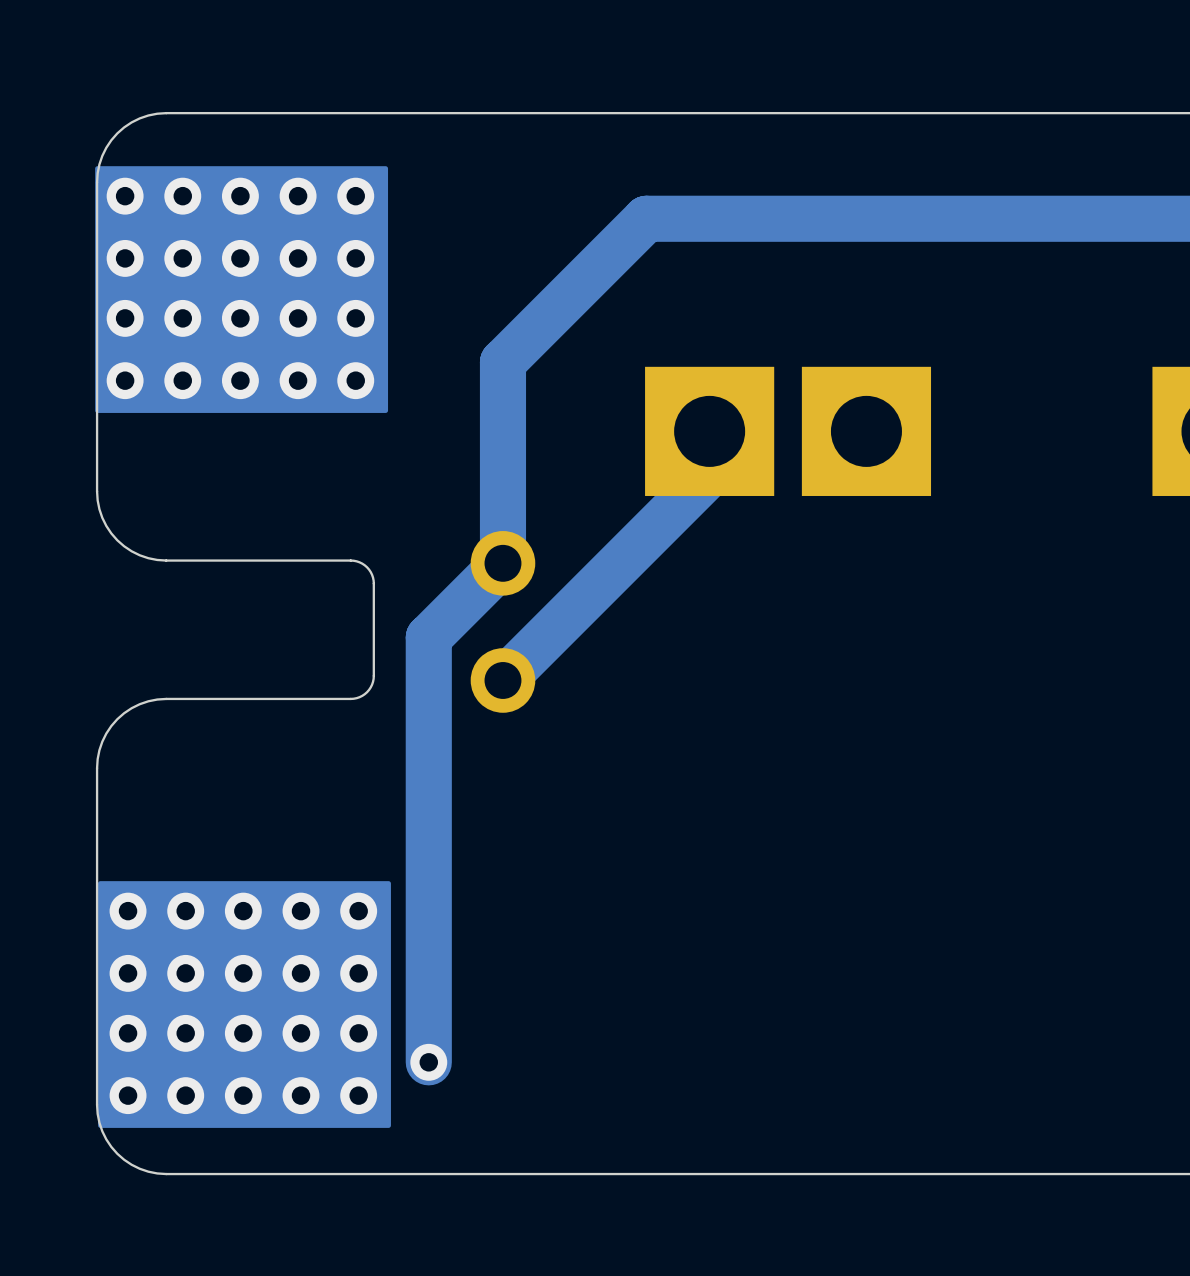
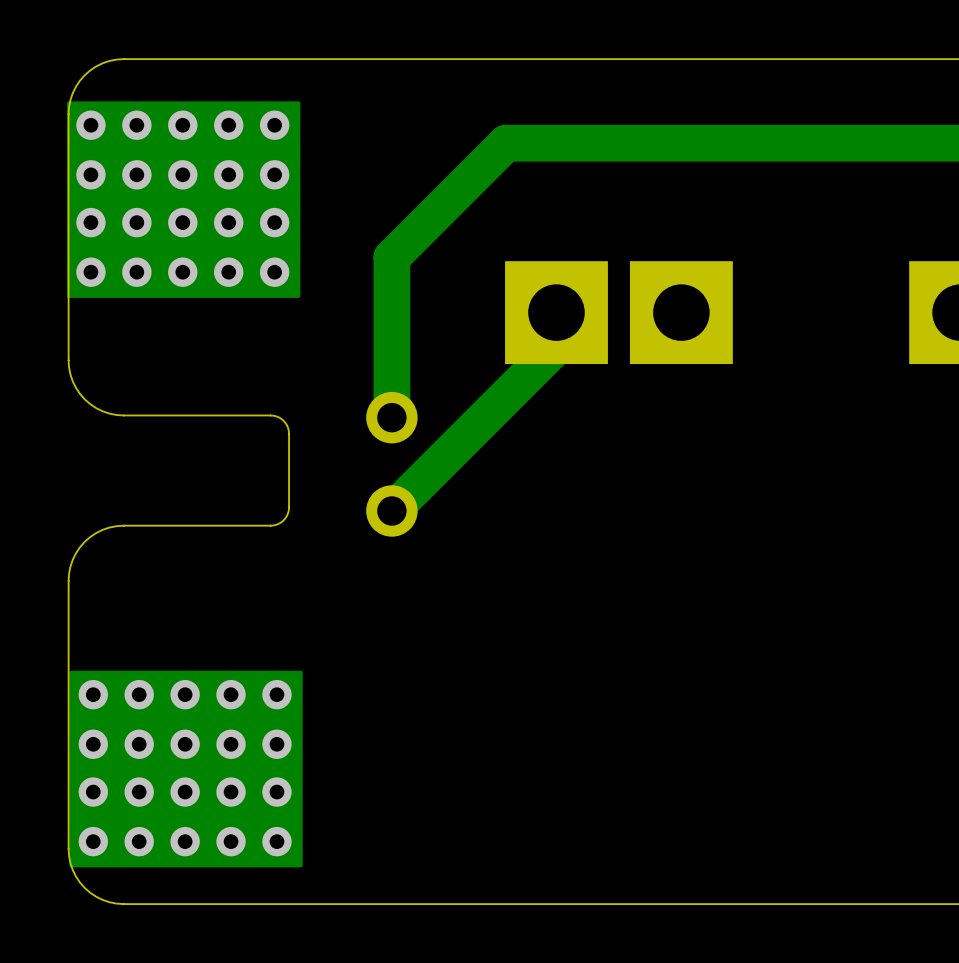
track: (502, 563) (428, 637) (428, 1062) -> none
via: (428, 1062) -> none

